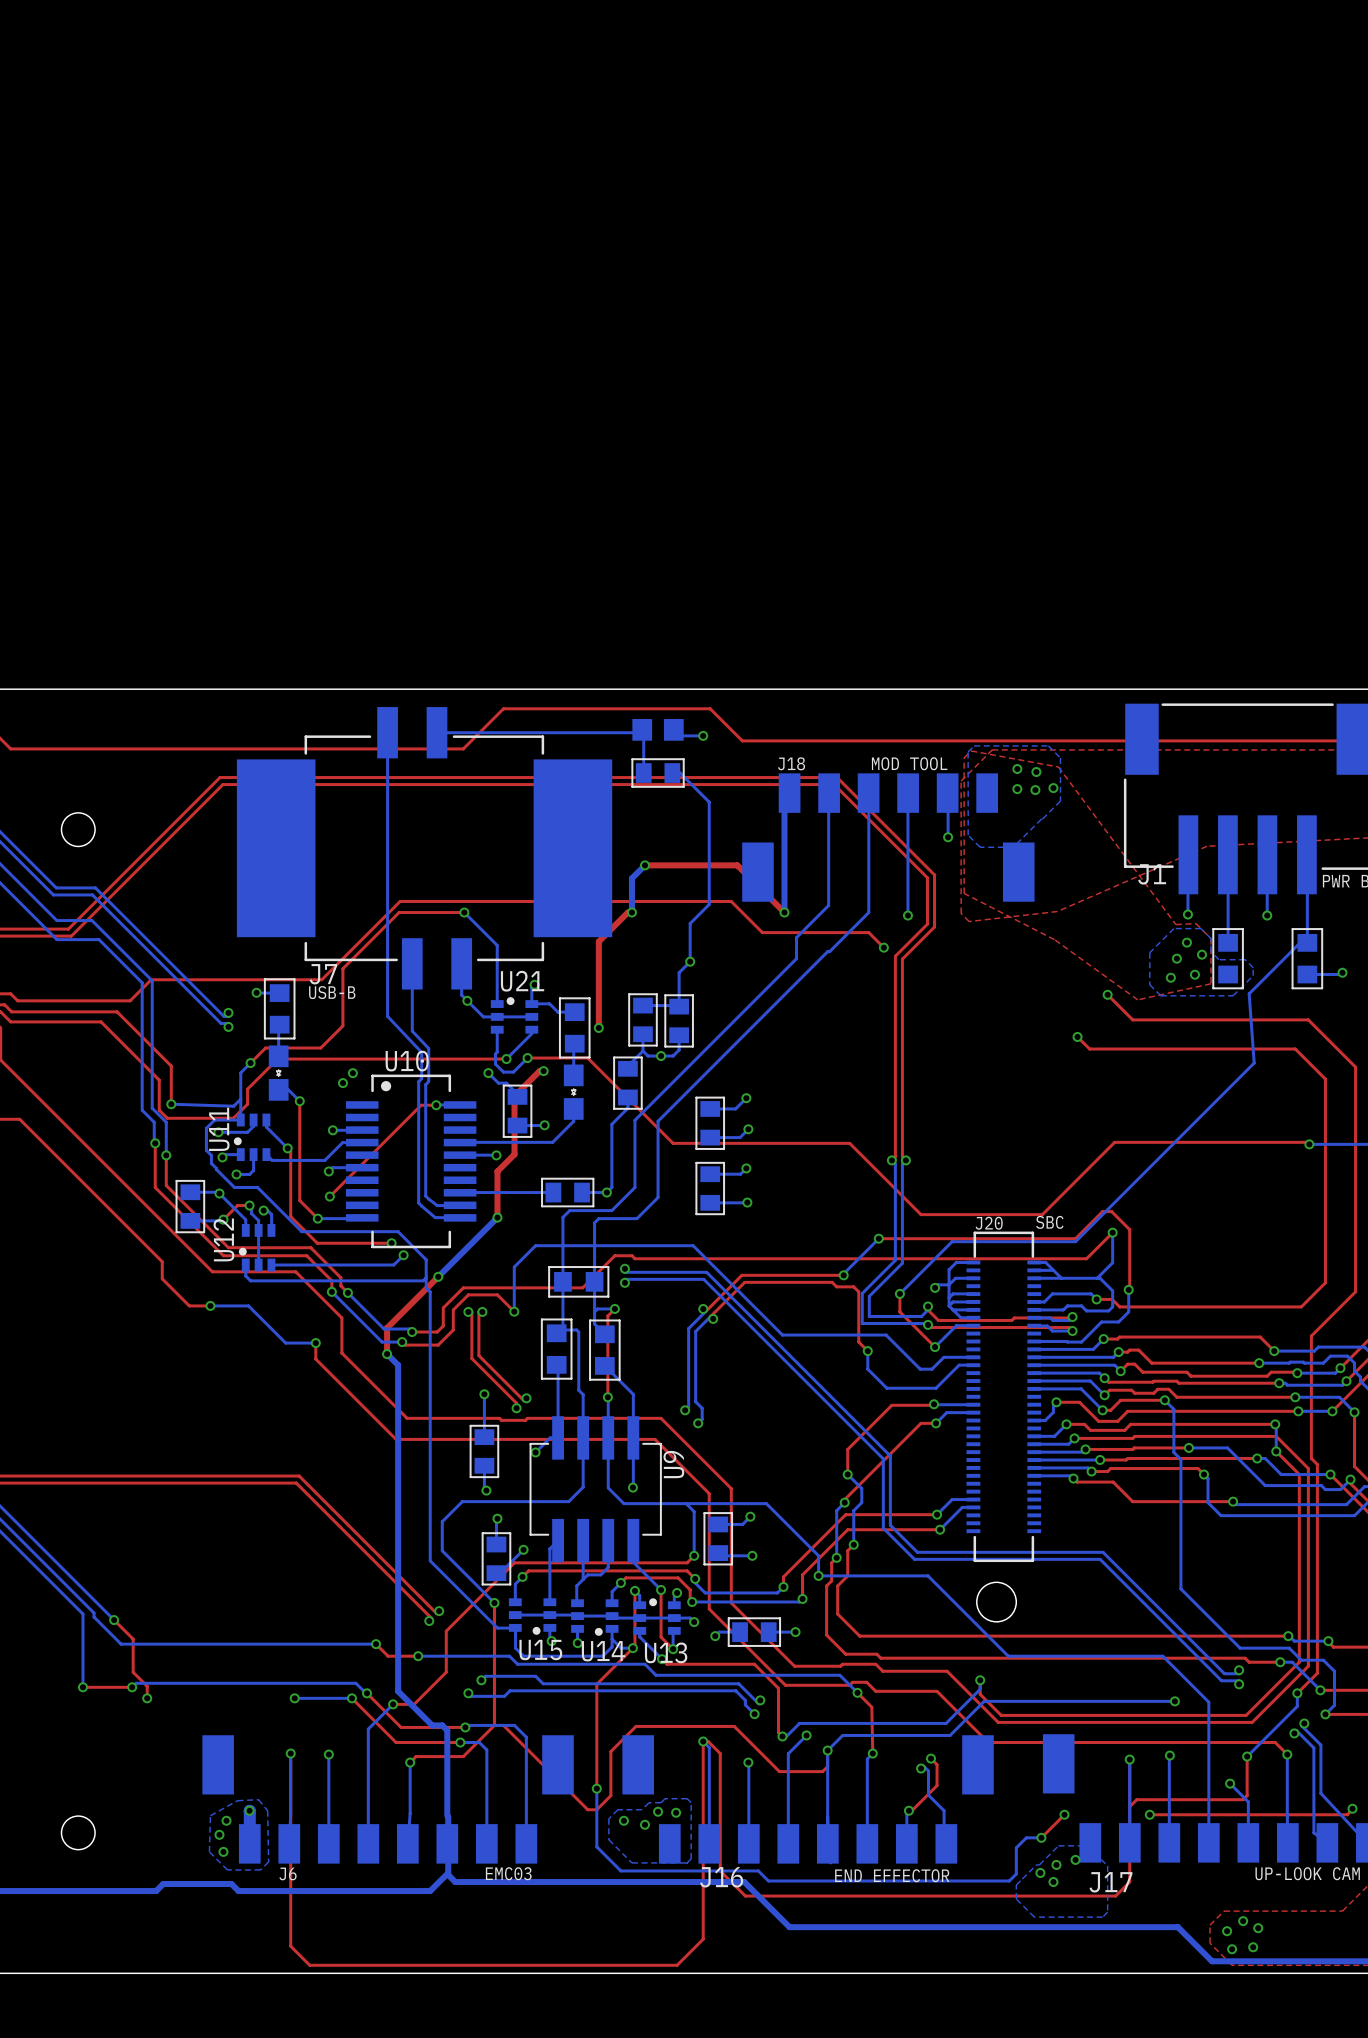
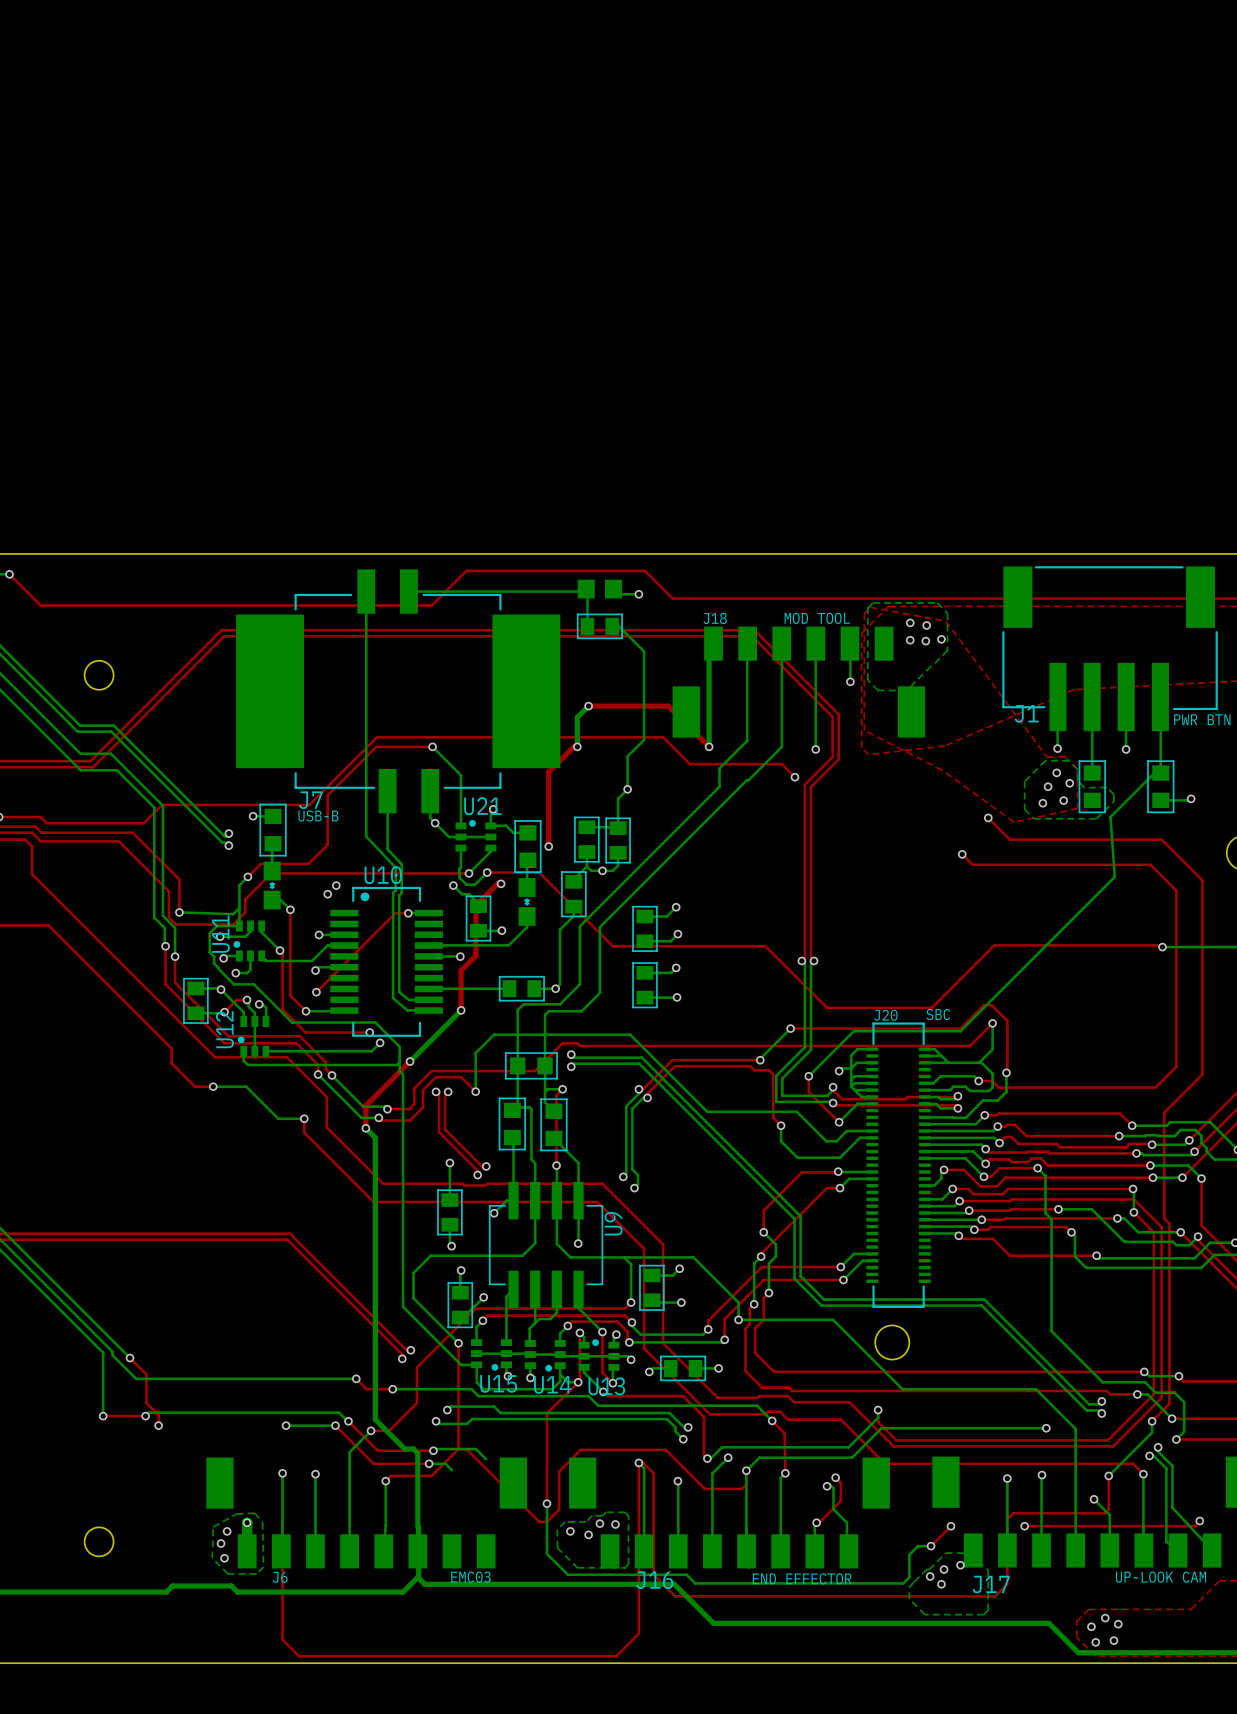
bottom track: (526, 1737) (526, 1843) -> none
bottom track: (486, 1749) (486, 1843) -> none

